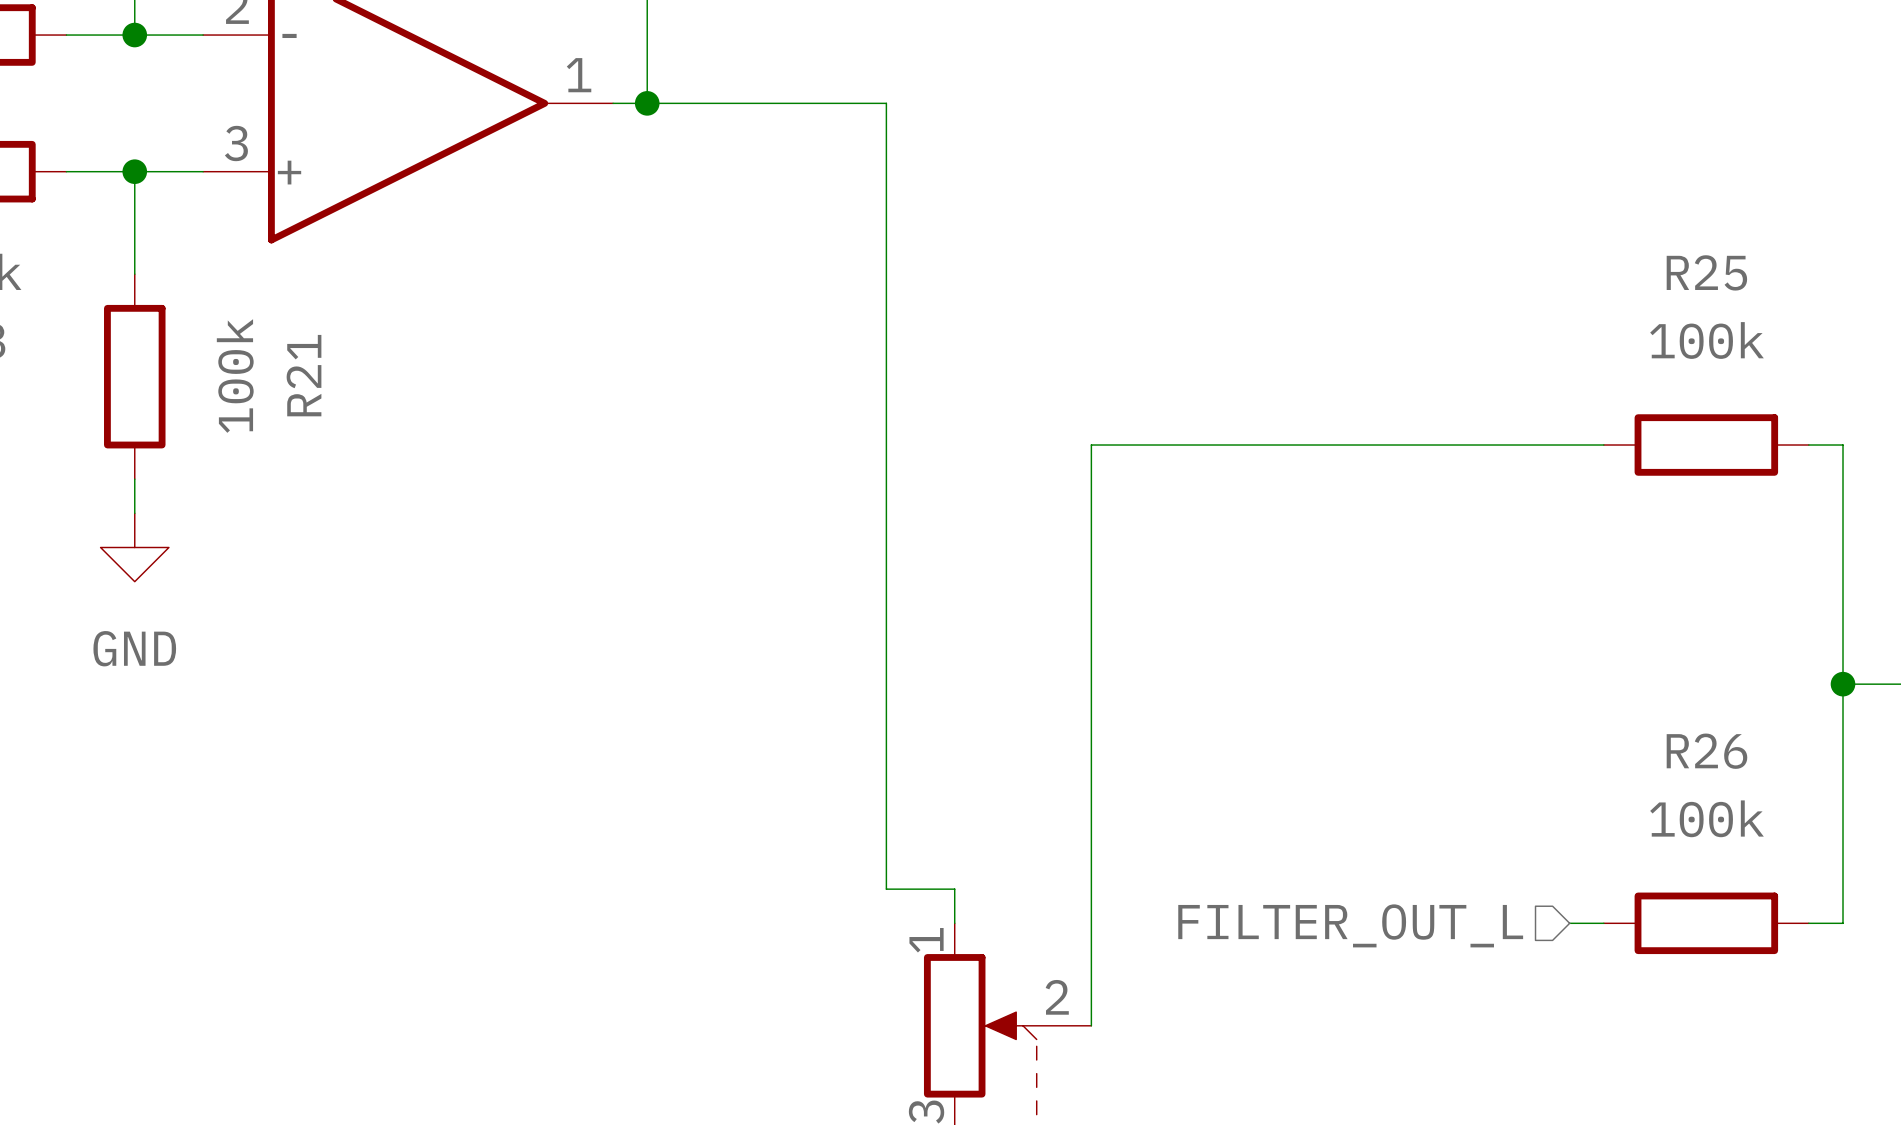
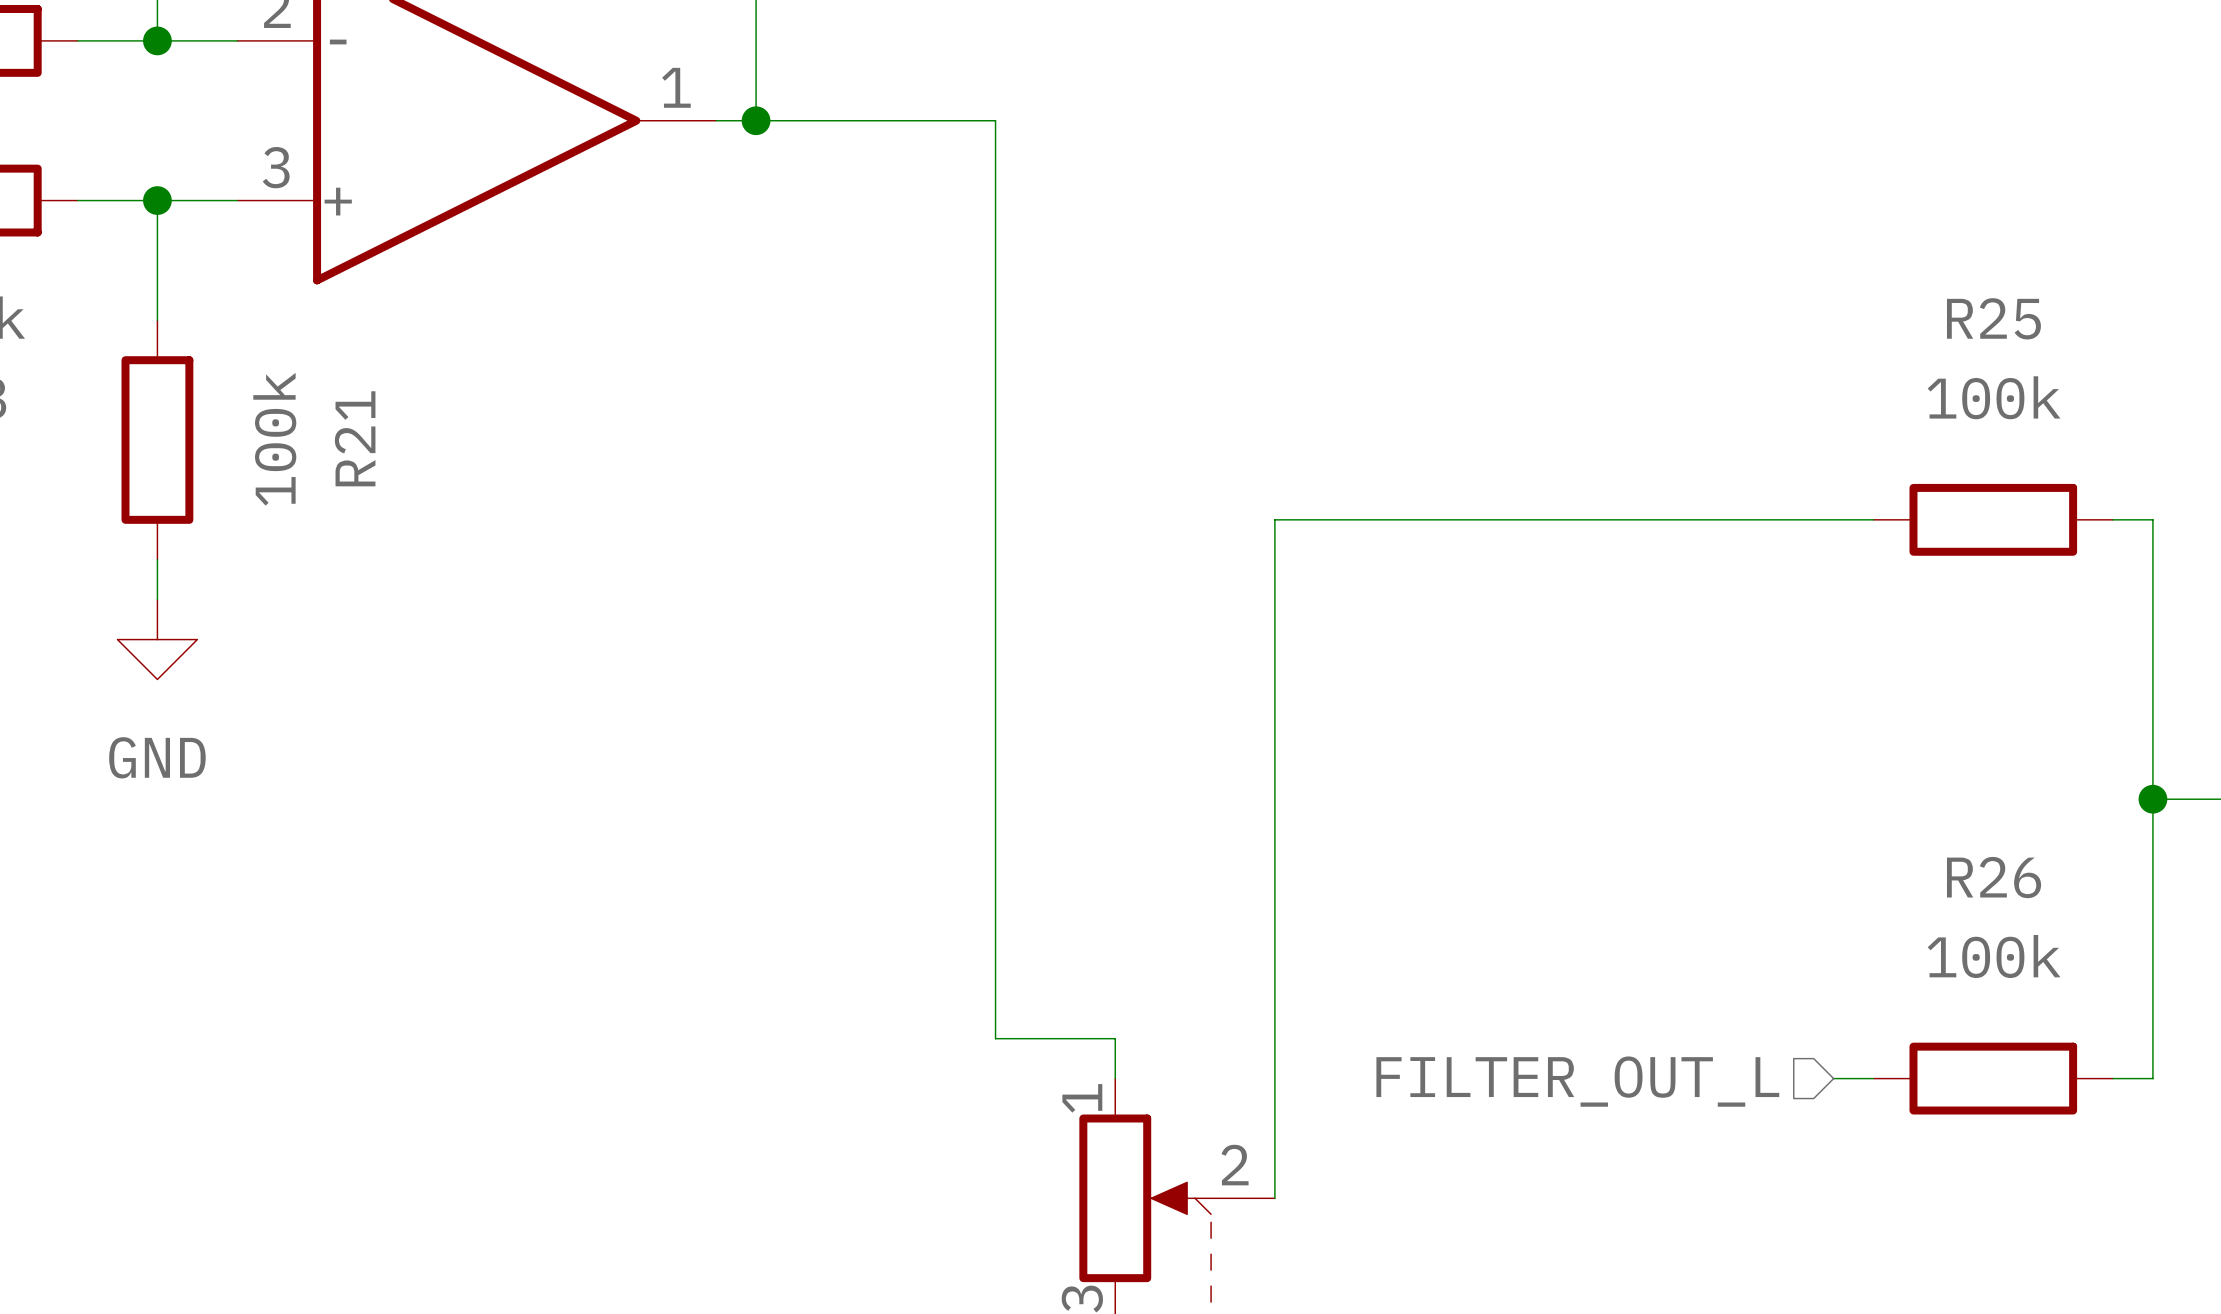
wire: (852, 103) (886, 103) (886, 889) -> (995, 120) (995, 1038) (1035, 1038)

